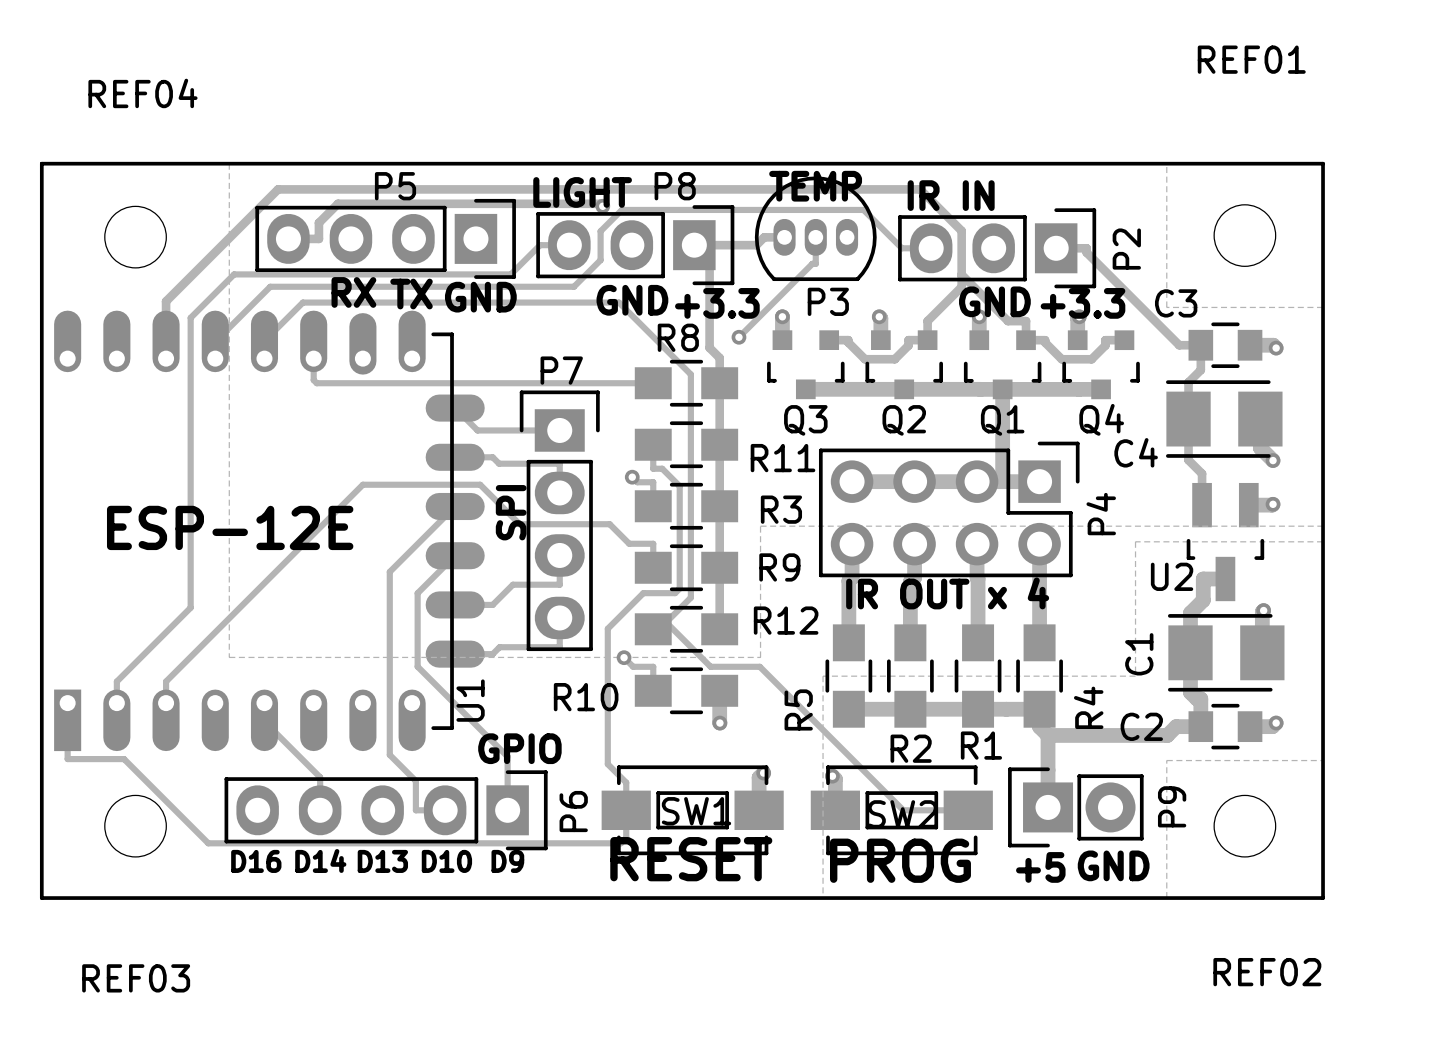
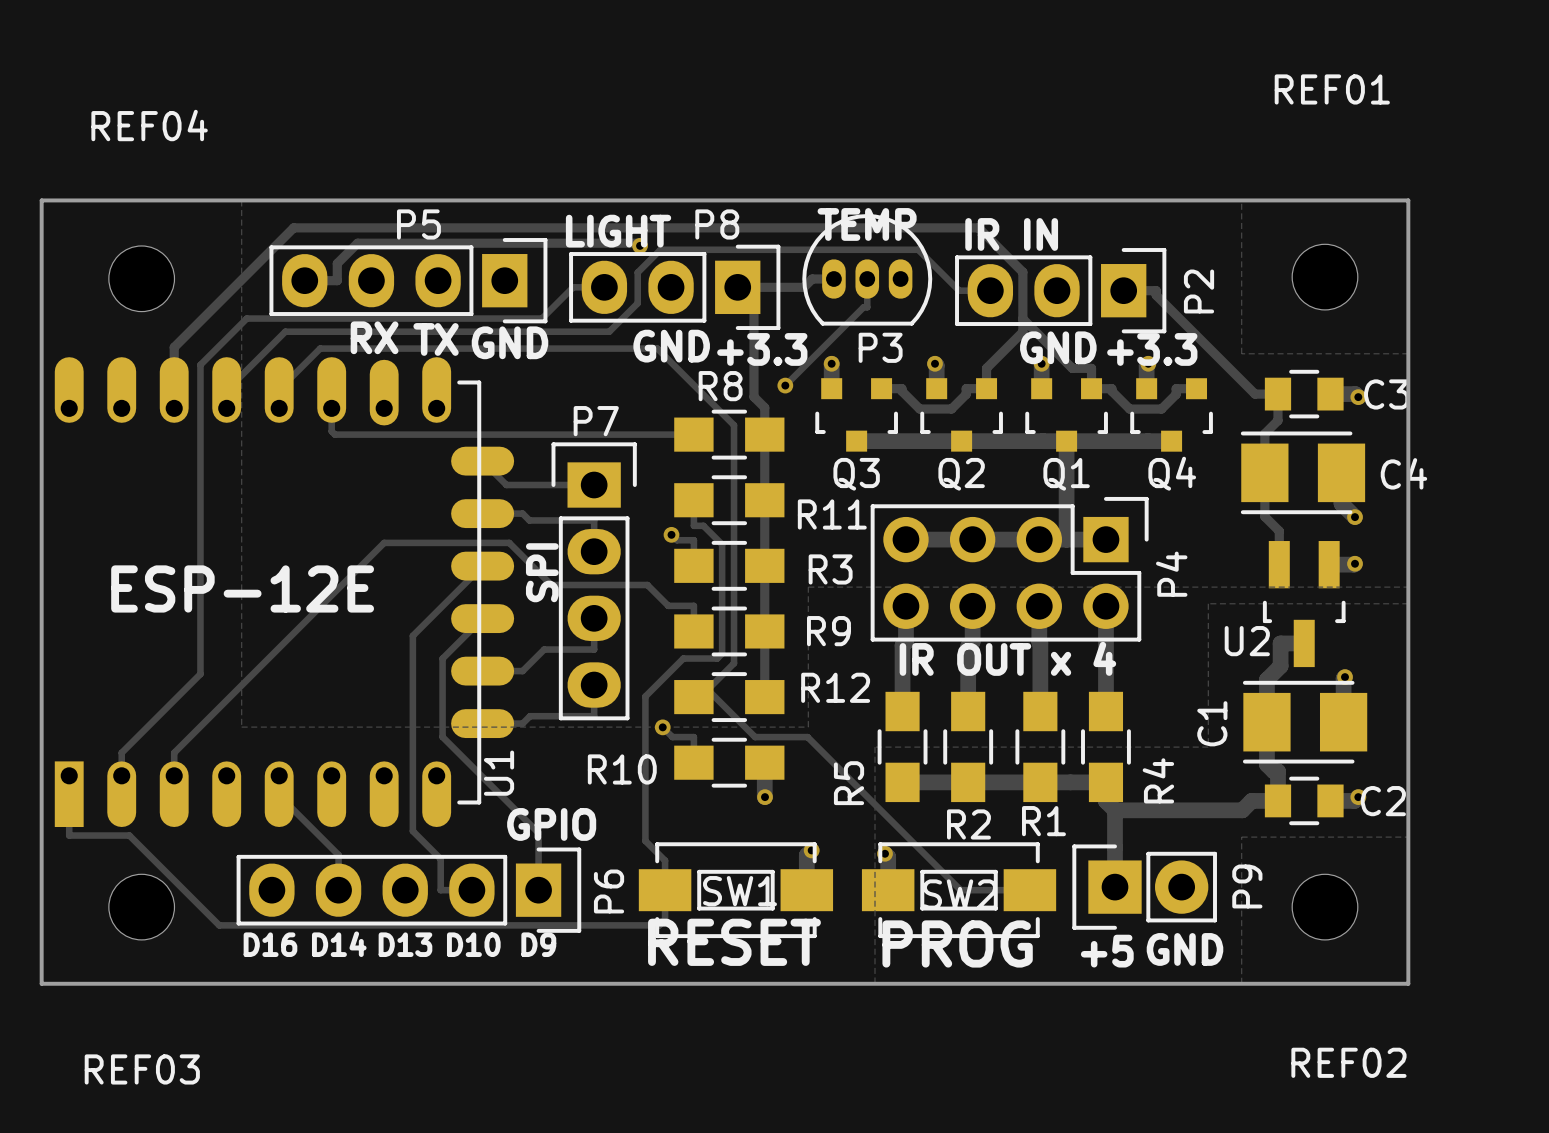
C3 name position: C3 (1176, 303) -> C3 (1386, 394)
C4 name position: C4 (1136, 452) -> C4 (1403, 473)
C2 name position: C2 (1141, 726) -> C2 (1383, 801)

